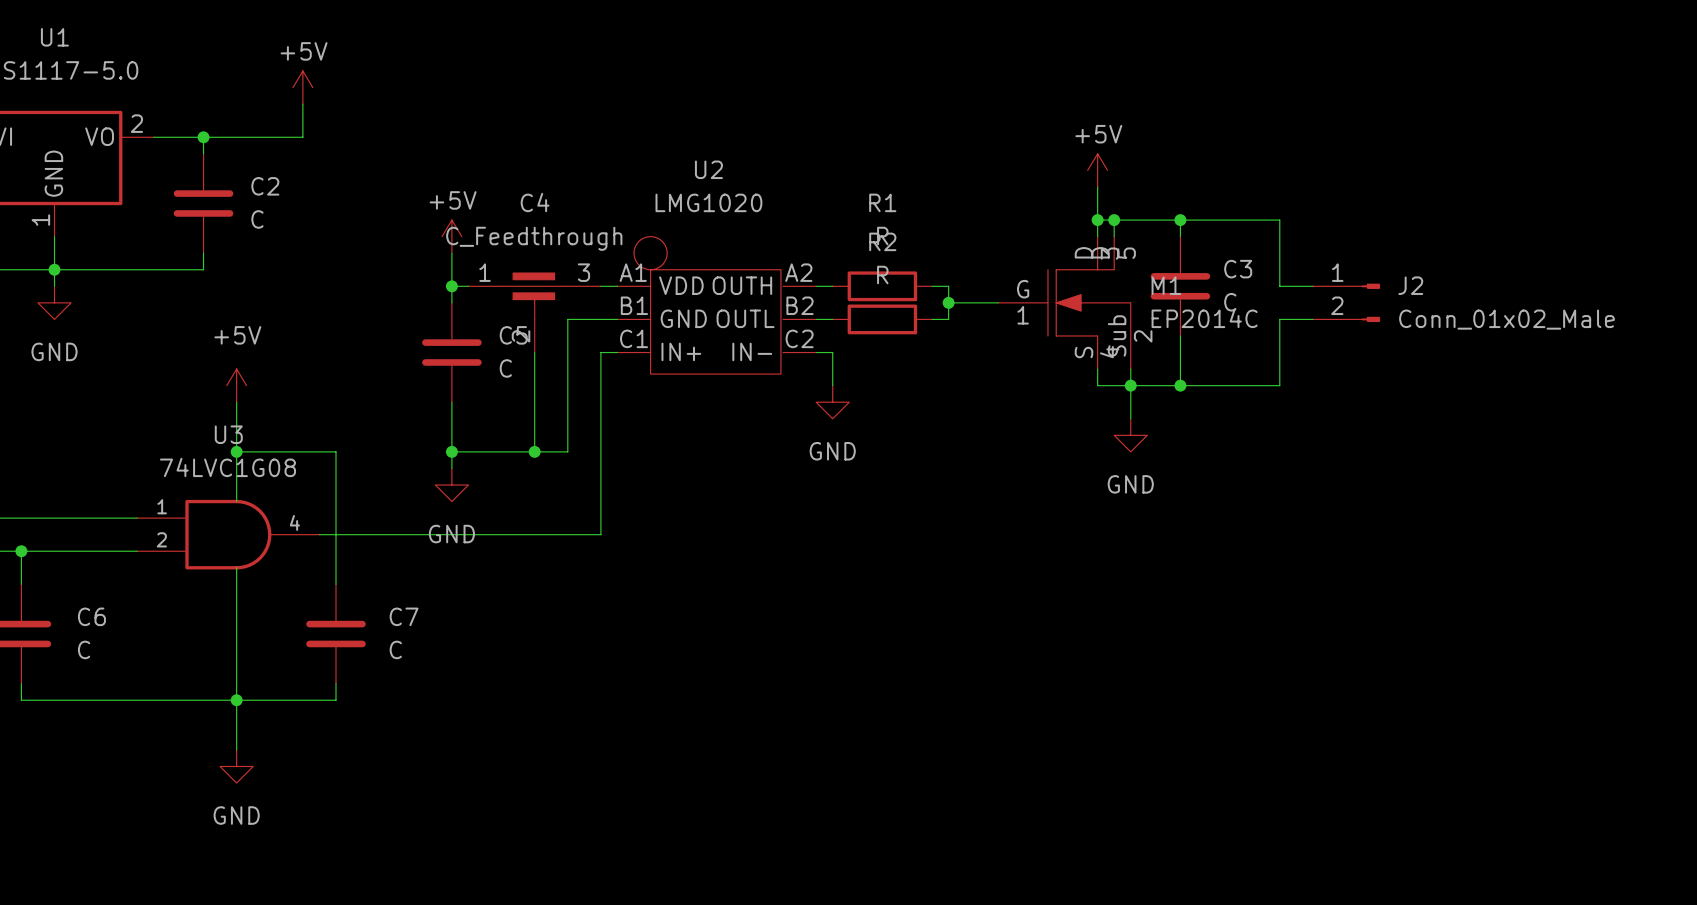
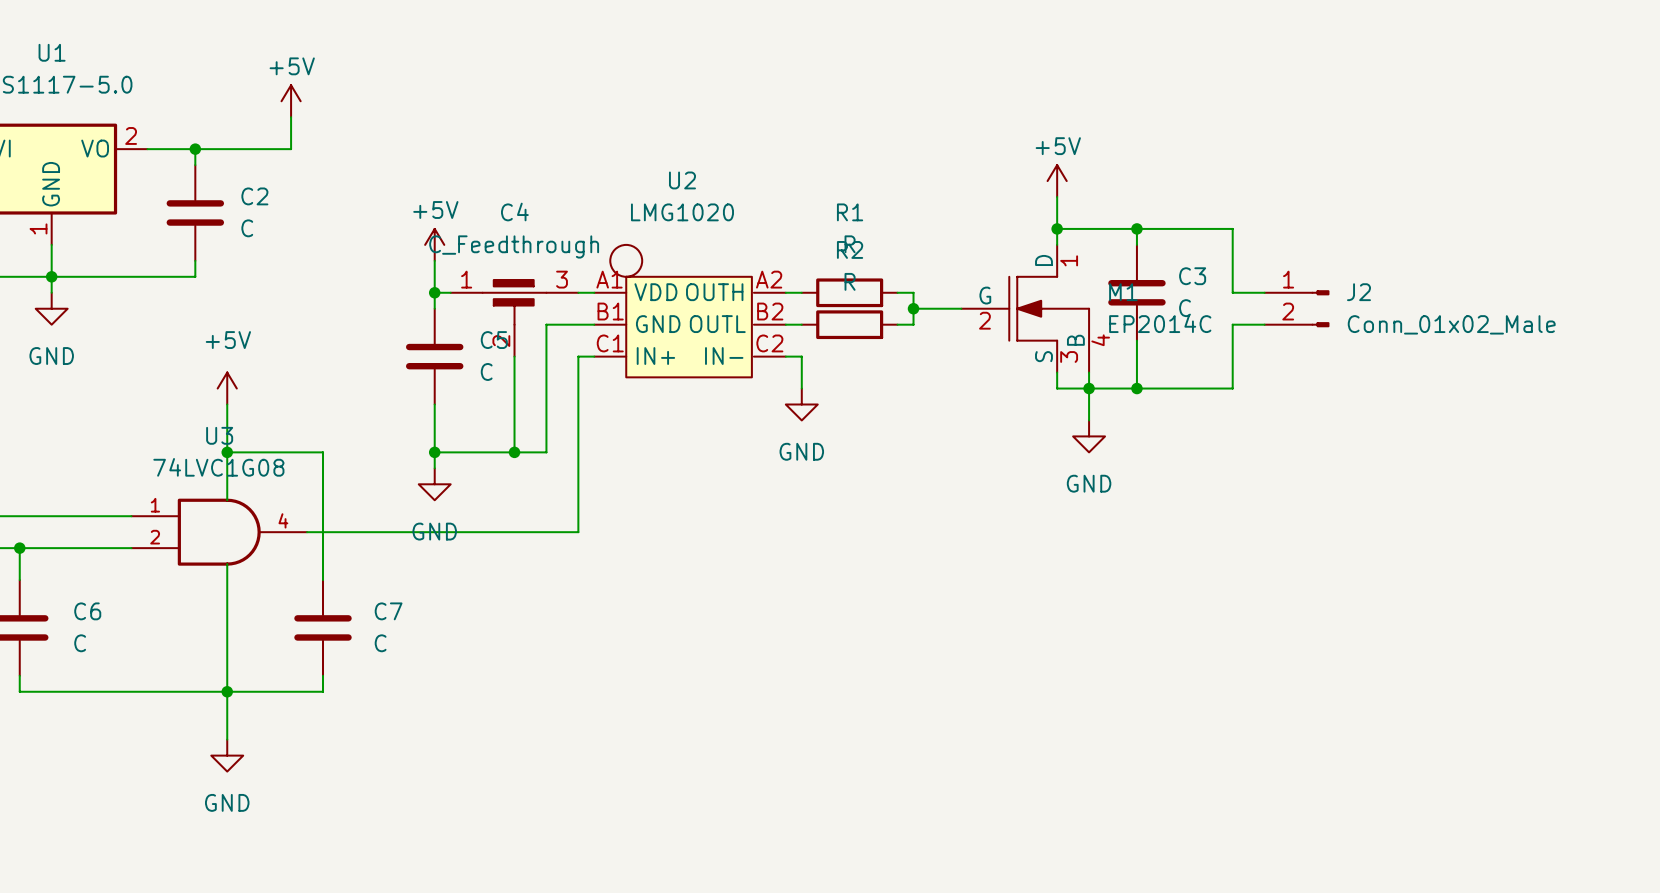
wire: (1114, 220) (1114, 236) -> none
junction: (1114, 220) -> none
M1 symbol: [998, 236, 1131, 370] -> [961, 244, 1090, 373]

